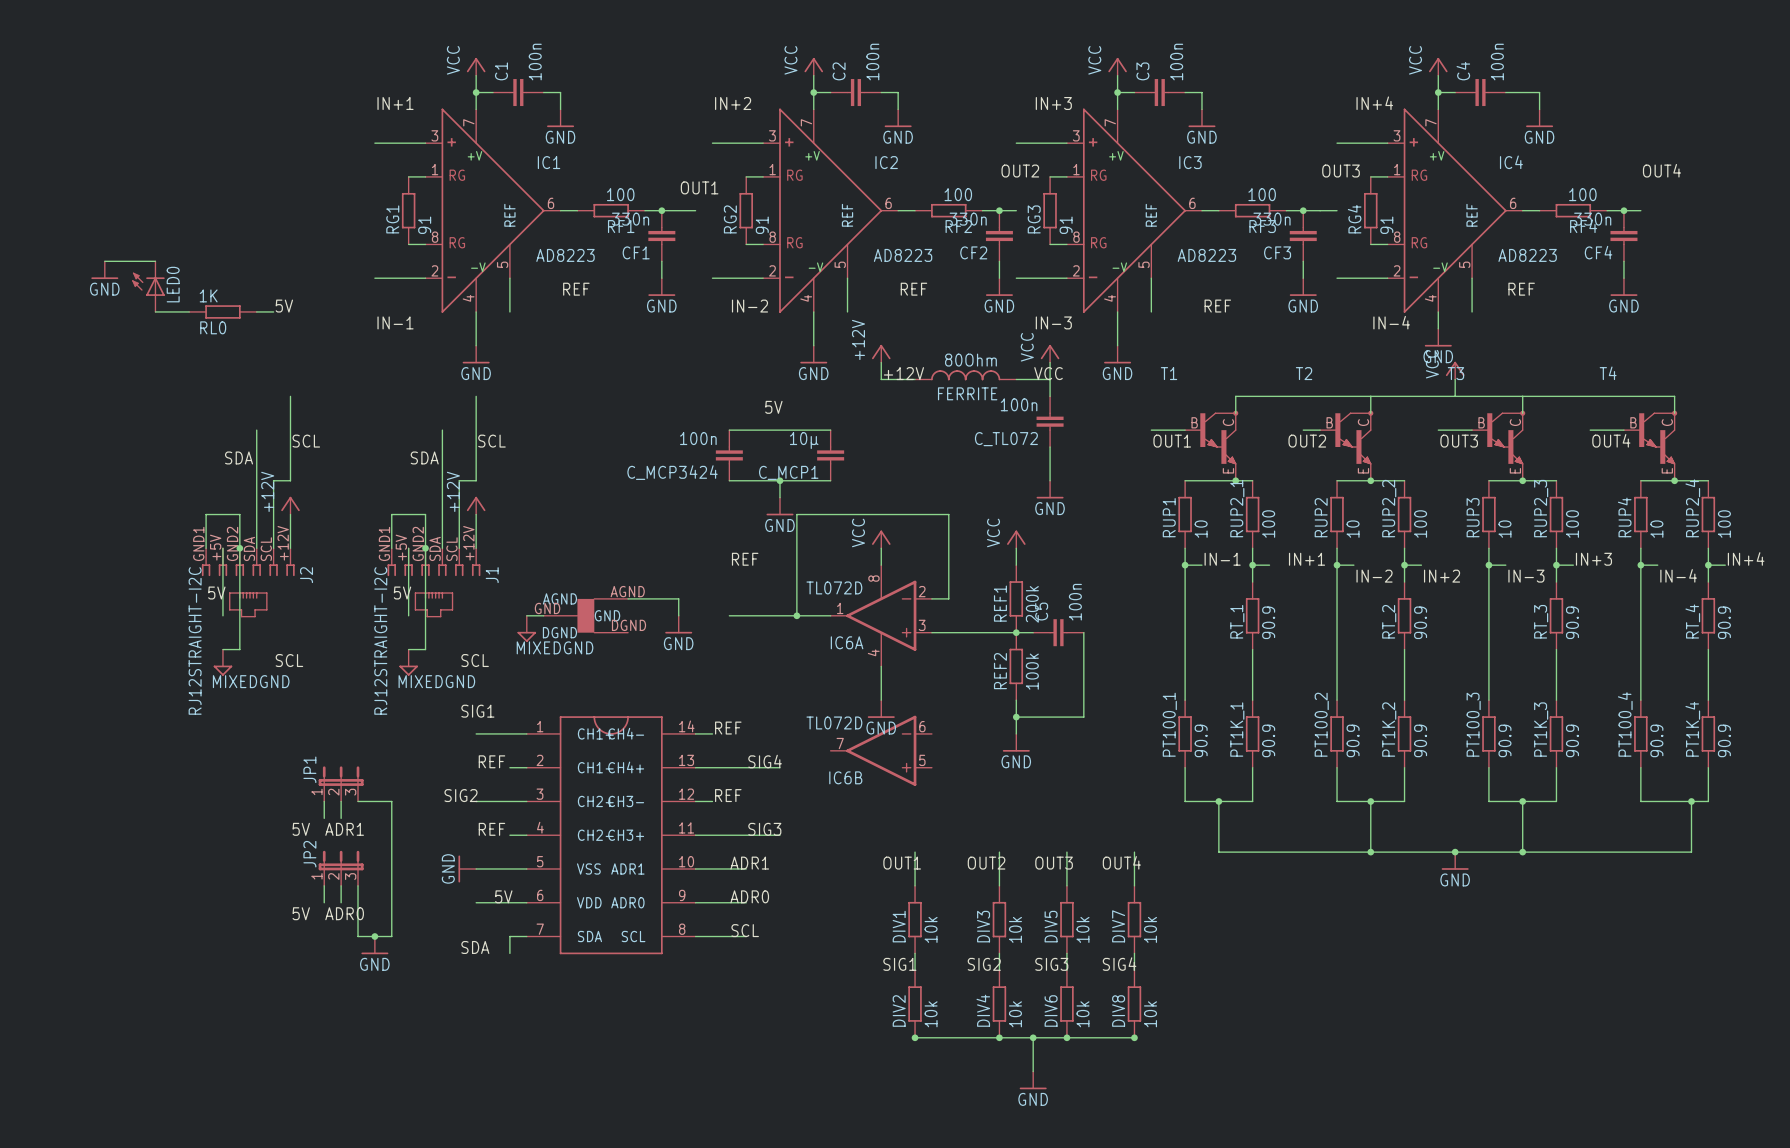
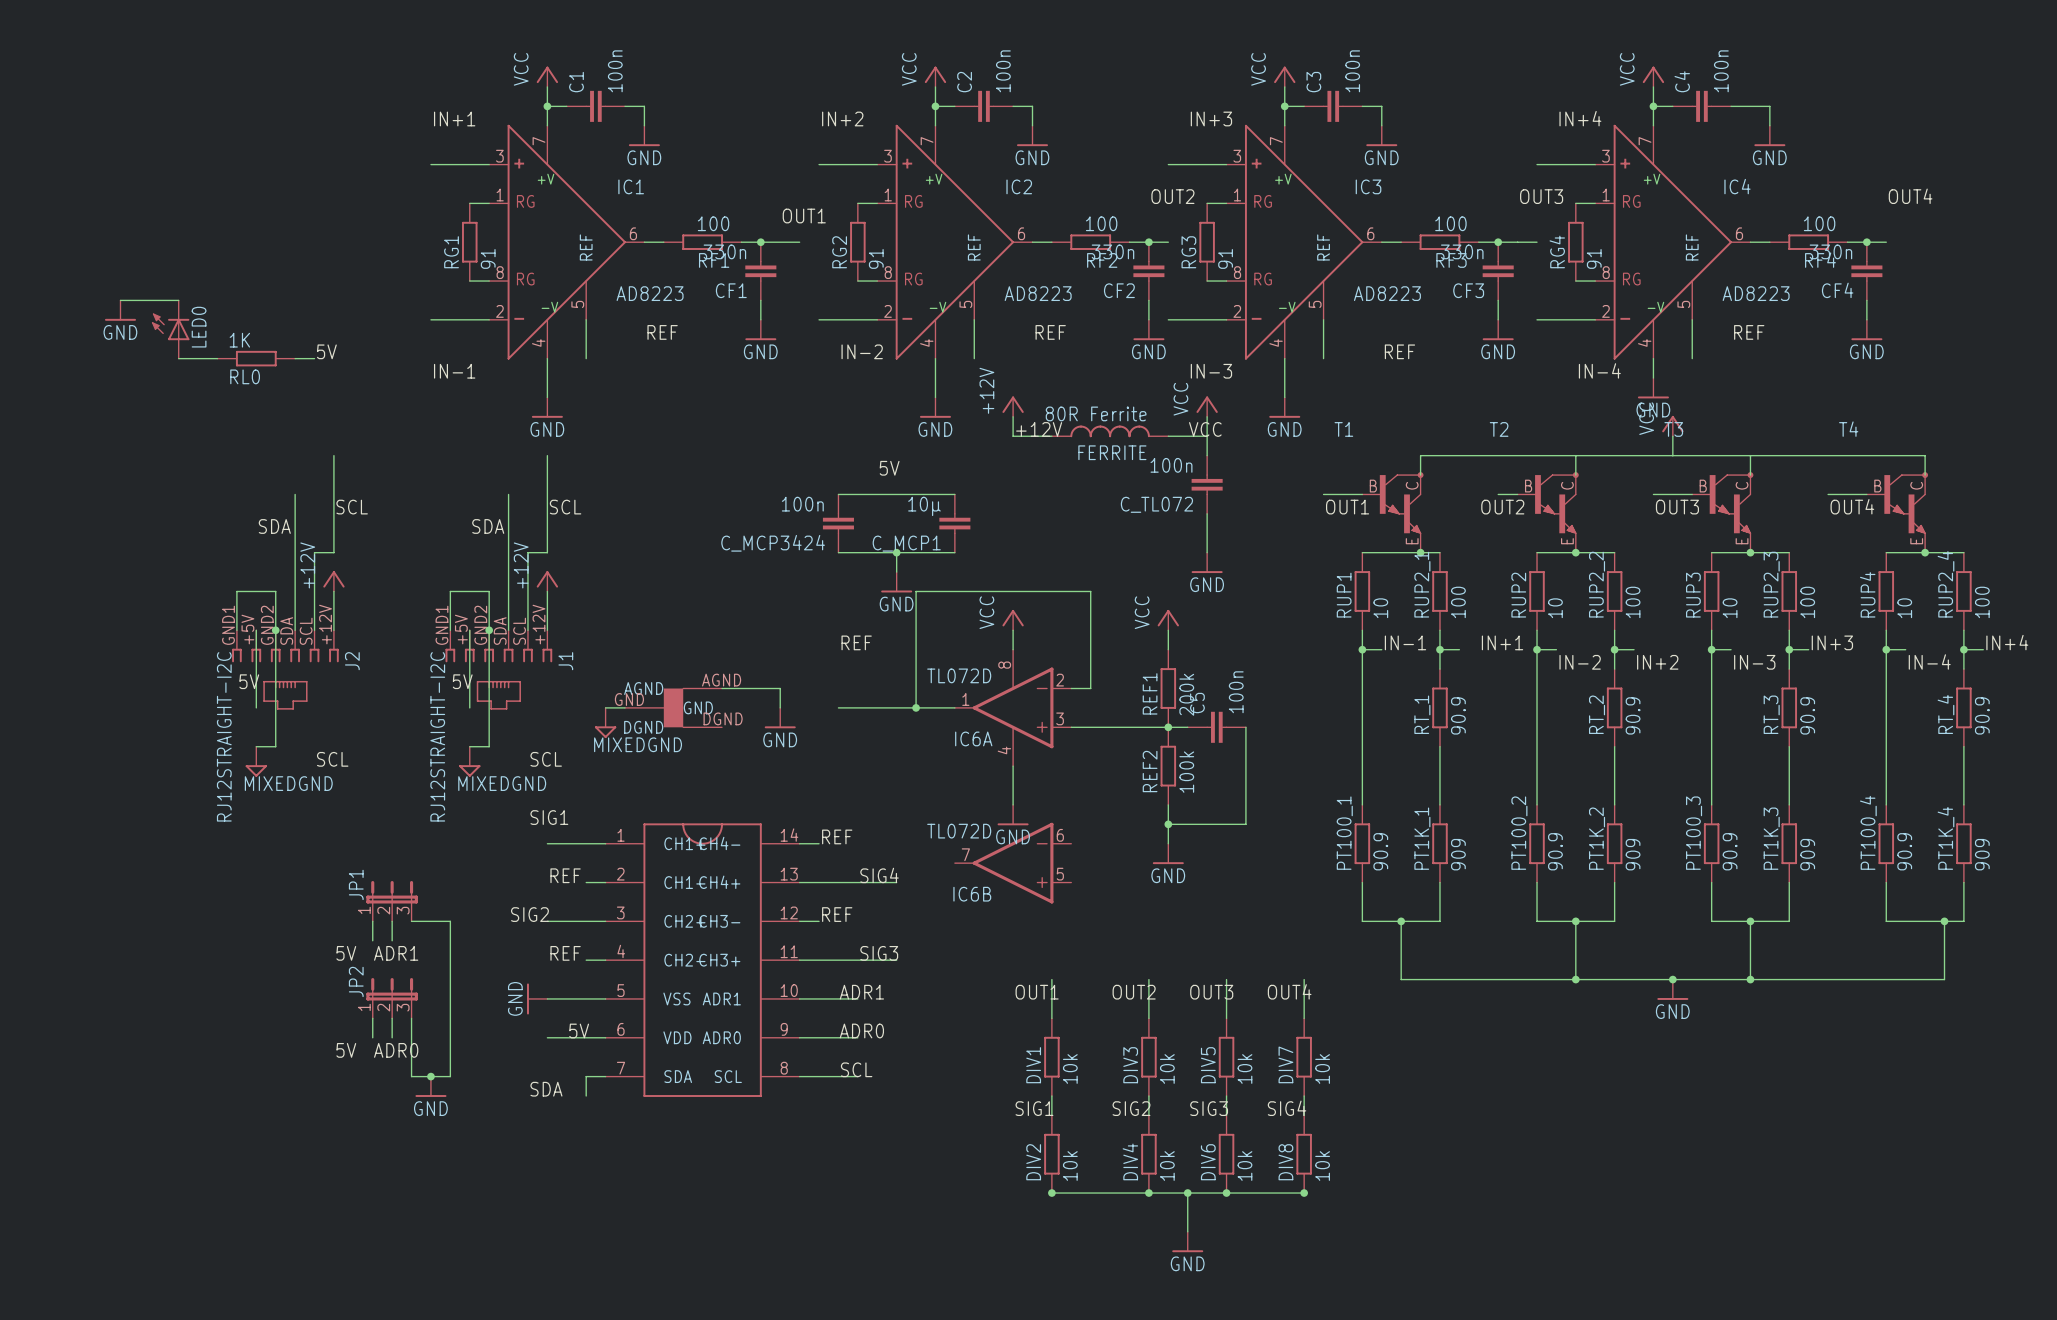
FERRITE value: 80Ohm (970, 360) -> 80R Ferrite (1096, 413)
PT1K_1 value: 90.9 (1268, 740) -> 909 (1458, 854)
PT1K_2 value: 90.9 (1420, 740) -> 909 (1633, 854)
PT1K_3 value: 90.9 (1572, 740) -> 909 (1807, 854)
PT1K_4 value: 90.9 (1724, 740) -> 909 (1982, 854)

